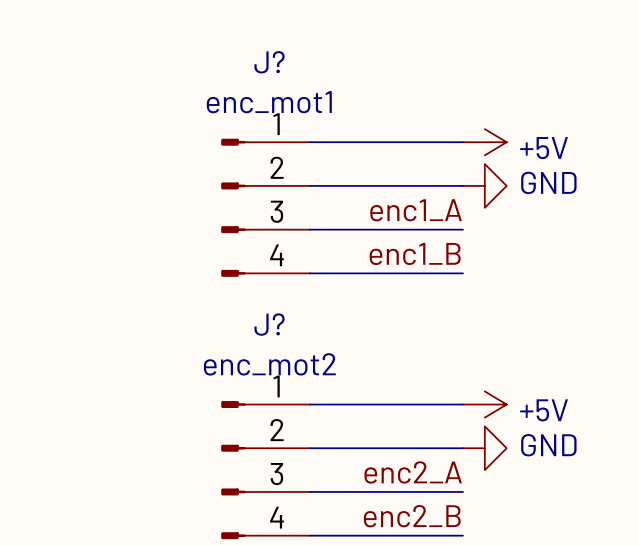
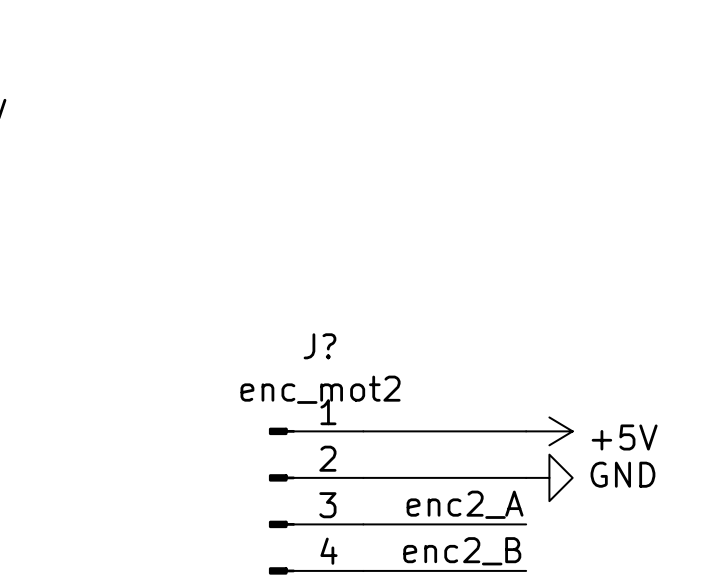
wire: (309, 142) (462, 142) -> none
power symbol: +5V (484, 142) -> none
wire: (309, 185) (462, 185) -> none
power symbol: GND (484, 185) -> none
J?: enc_mot1 (265, 207) -> none
label: enc1_A (416, 210) -> none
wire: (309, 229) (462, 229) -> none
label: enc1_B (415, 254) -> none
wire: (309, 273) (462, 273) -> none

